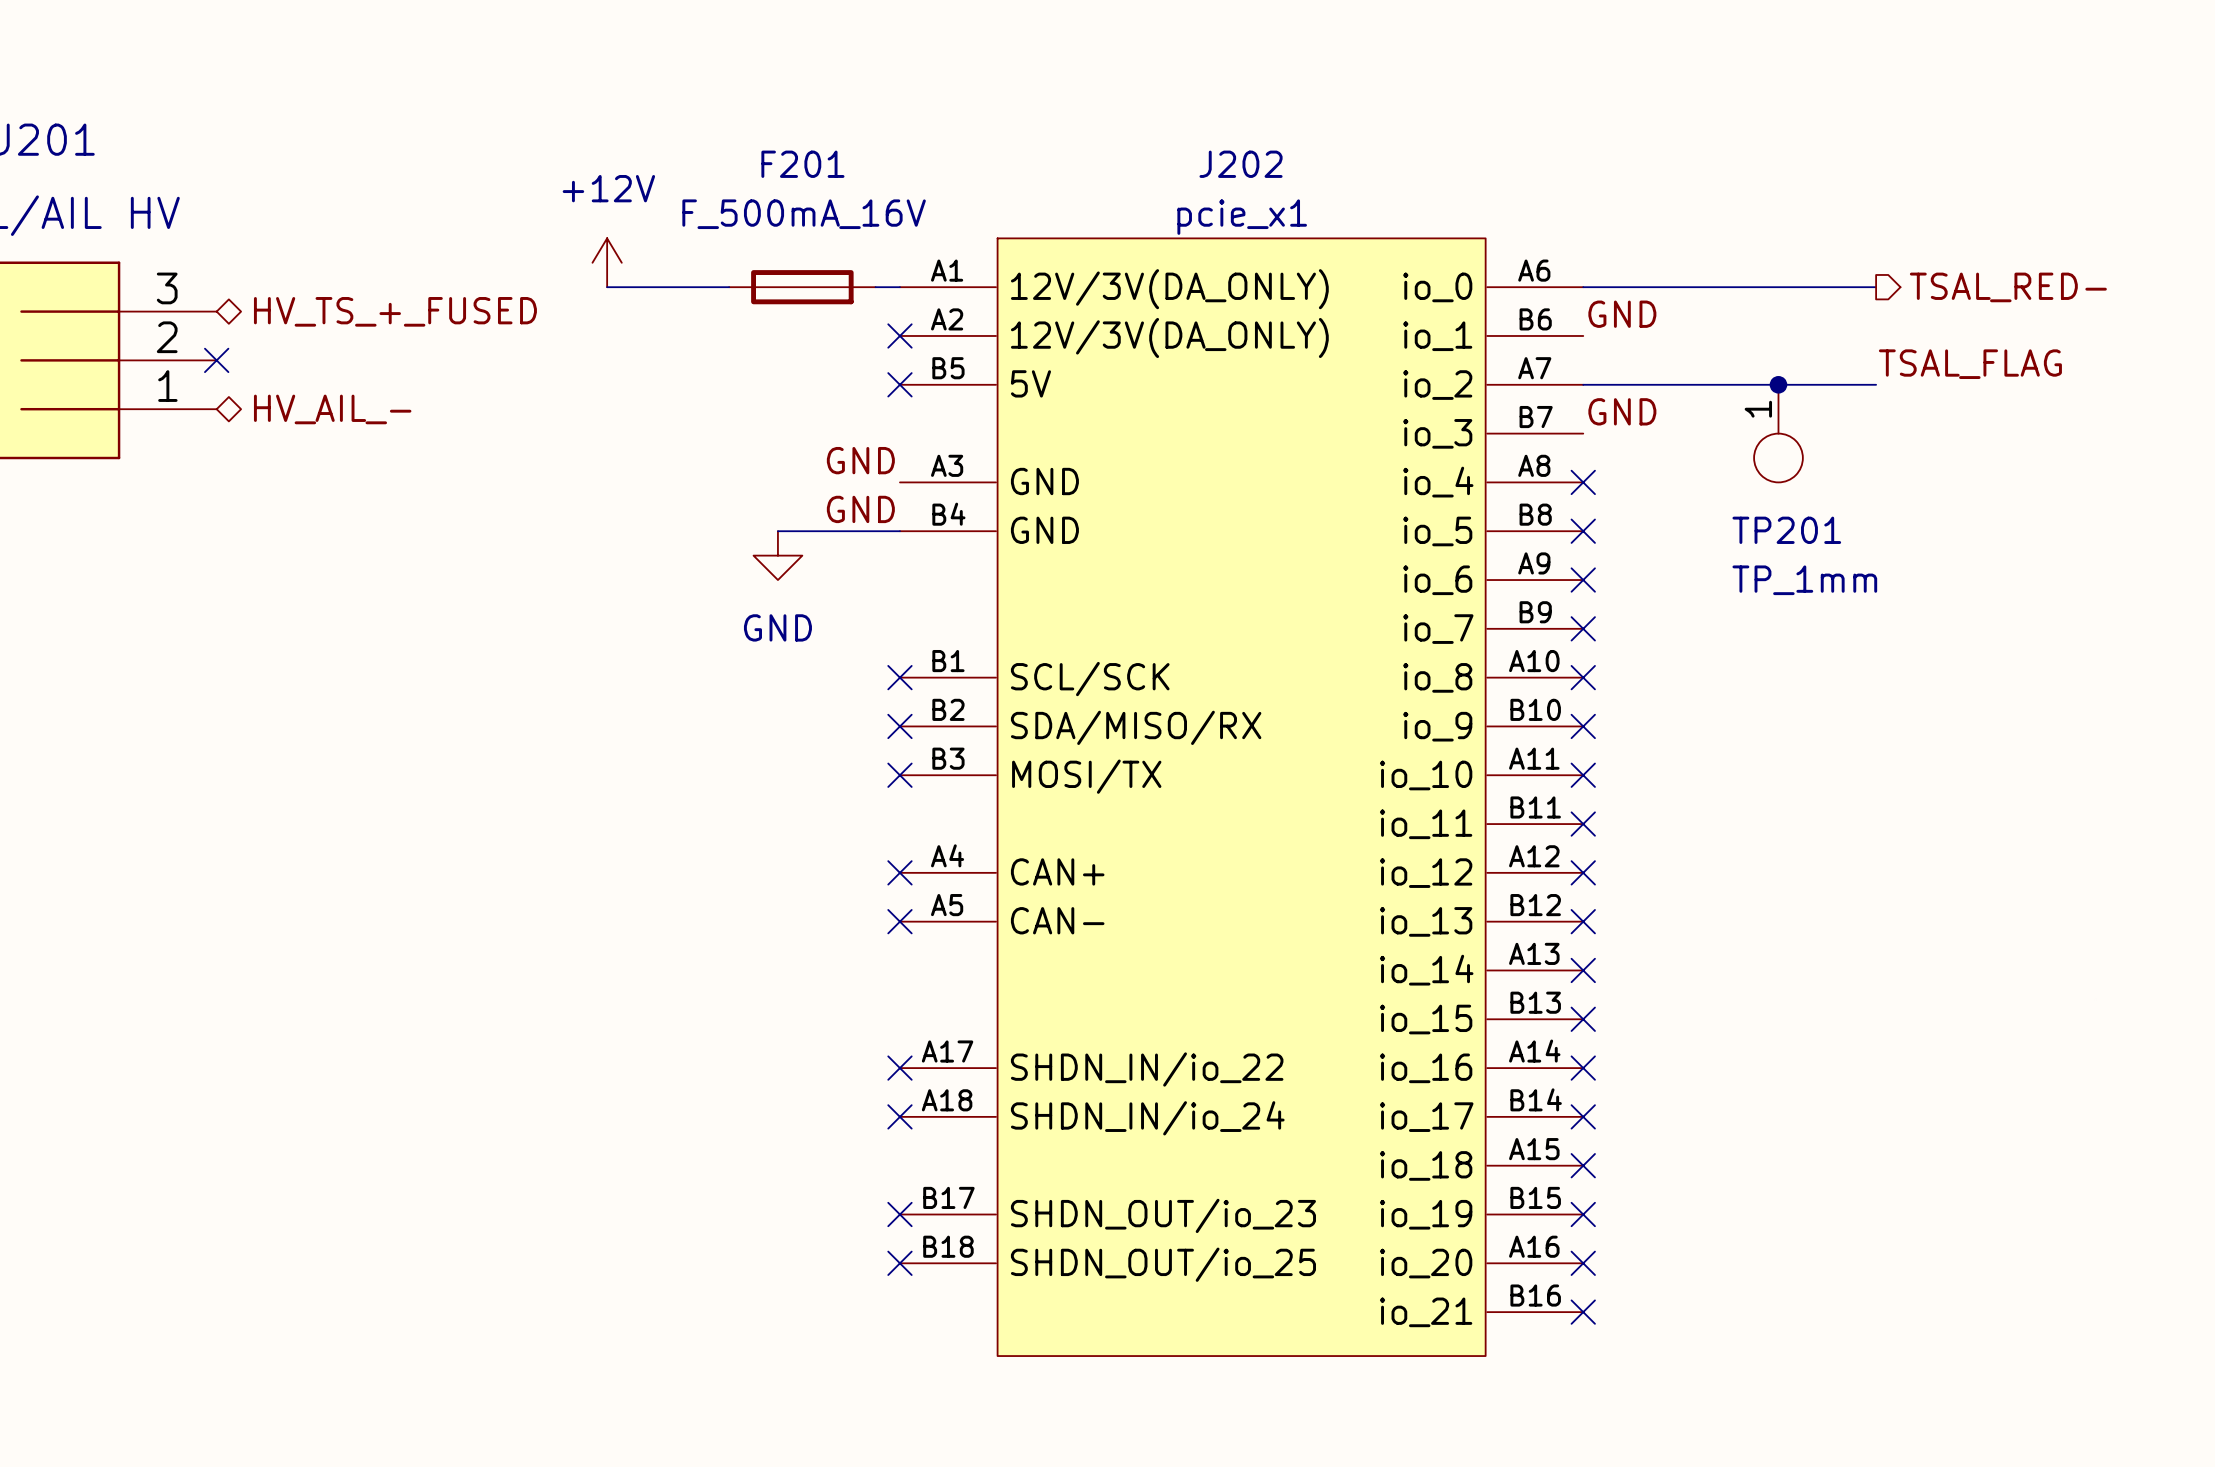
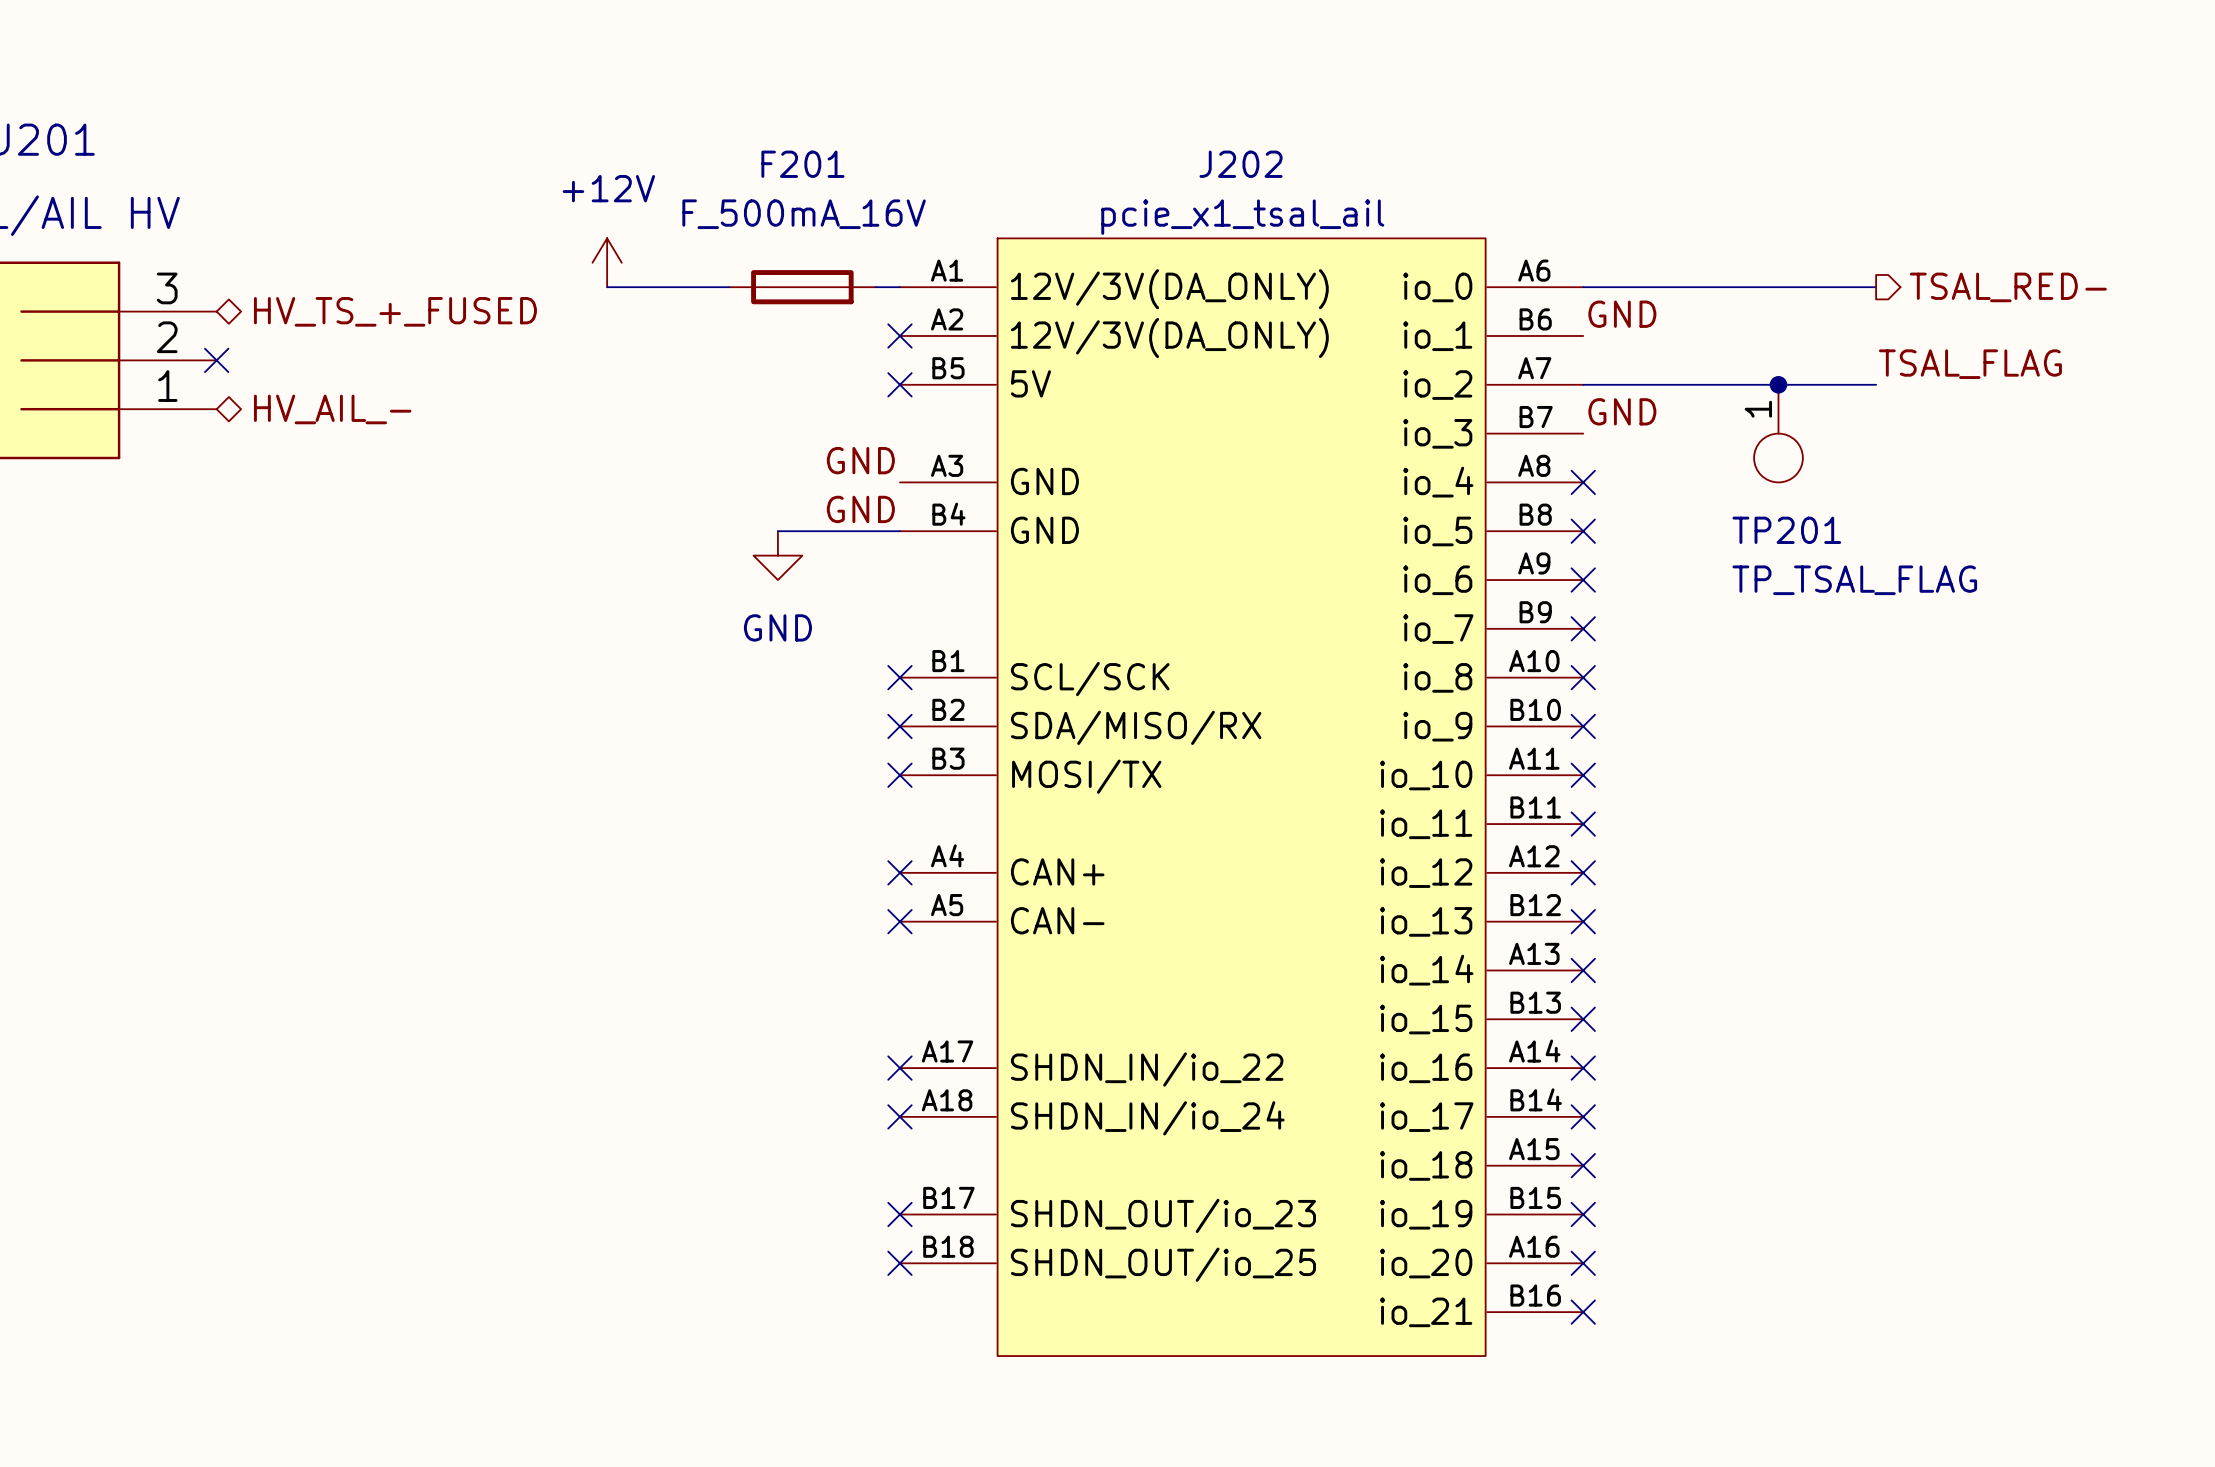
J202 value: pcie_x1 (1242, 217) -> pcie_x1_tsal_ail (1242, 217)
TP201 value: TP_1mm (1804, 580) -> TP_TSAL_FLAG (1854, 580)

